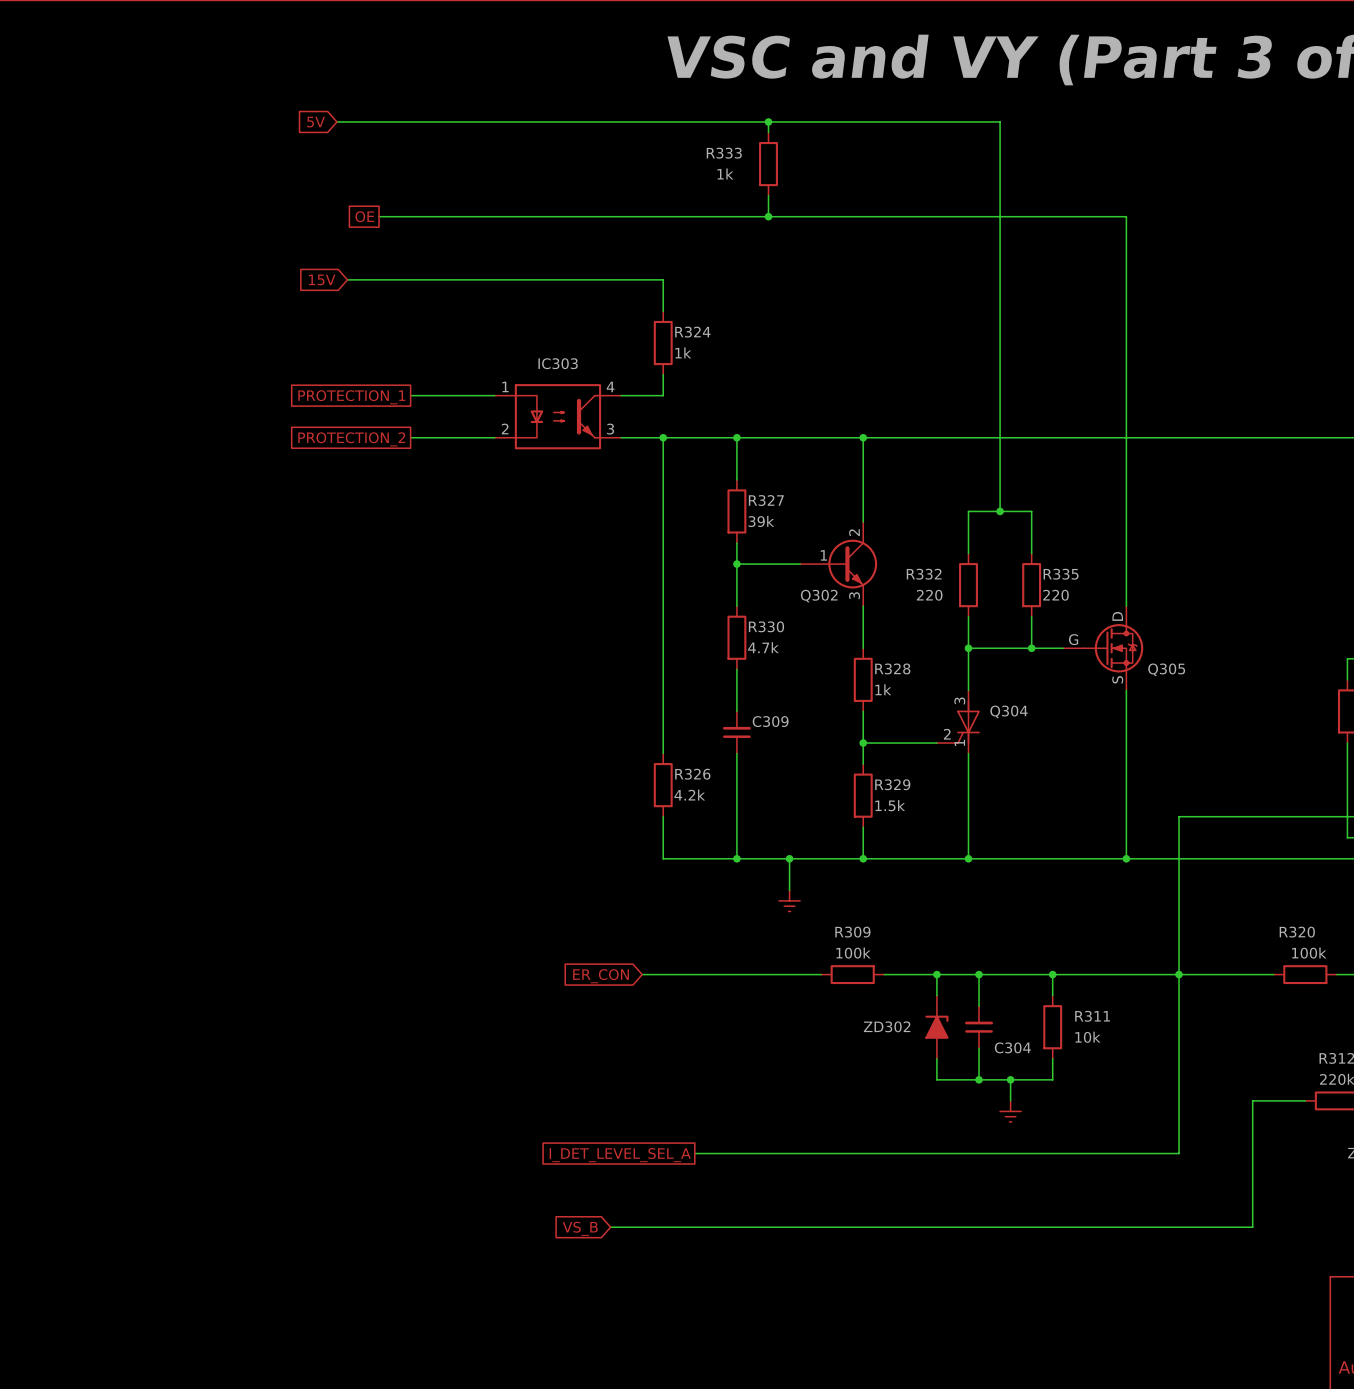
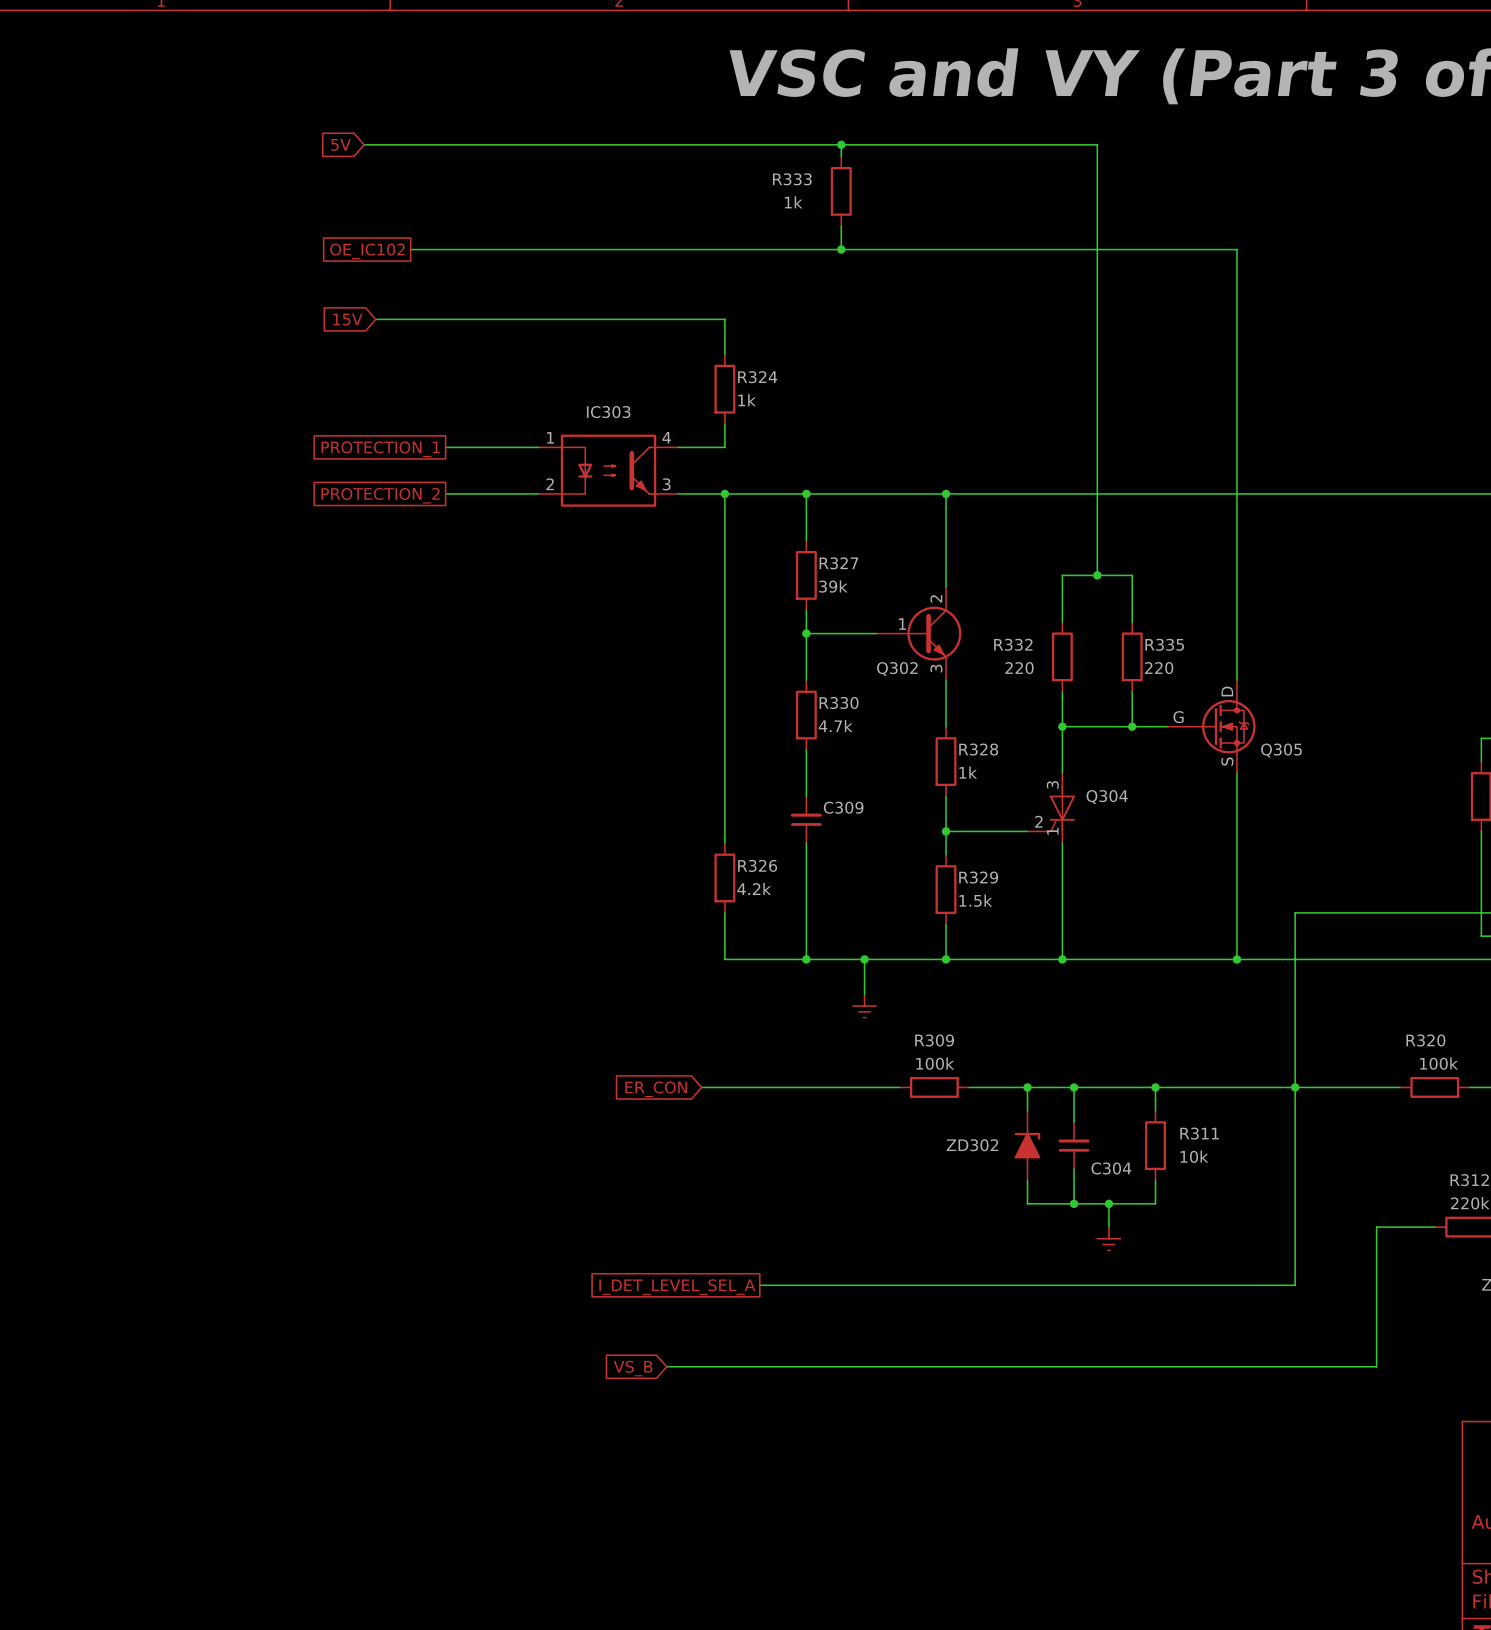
global label: OE (364, 216) -> OE_IC102 (367, 251)

